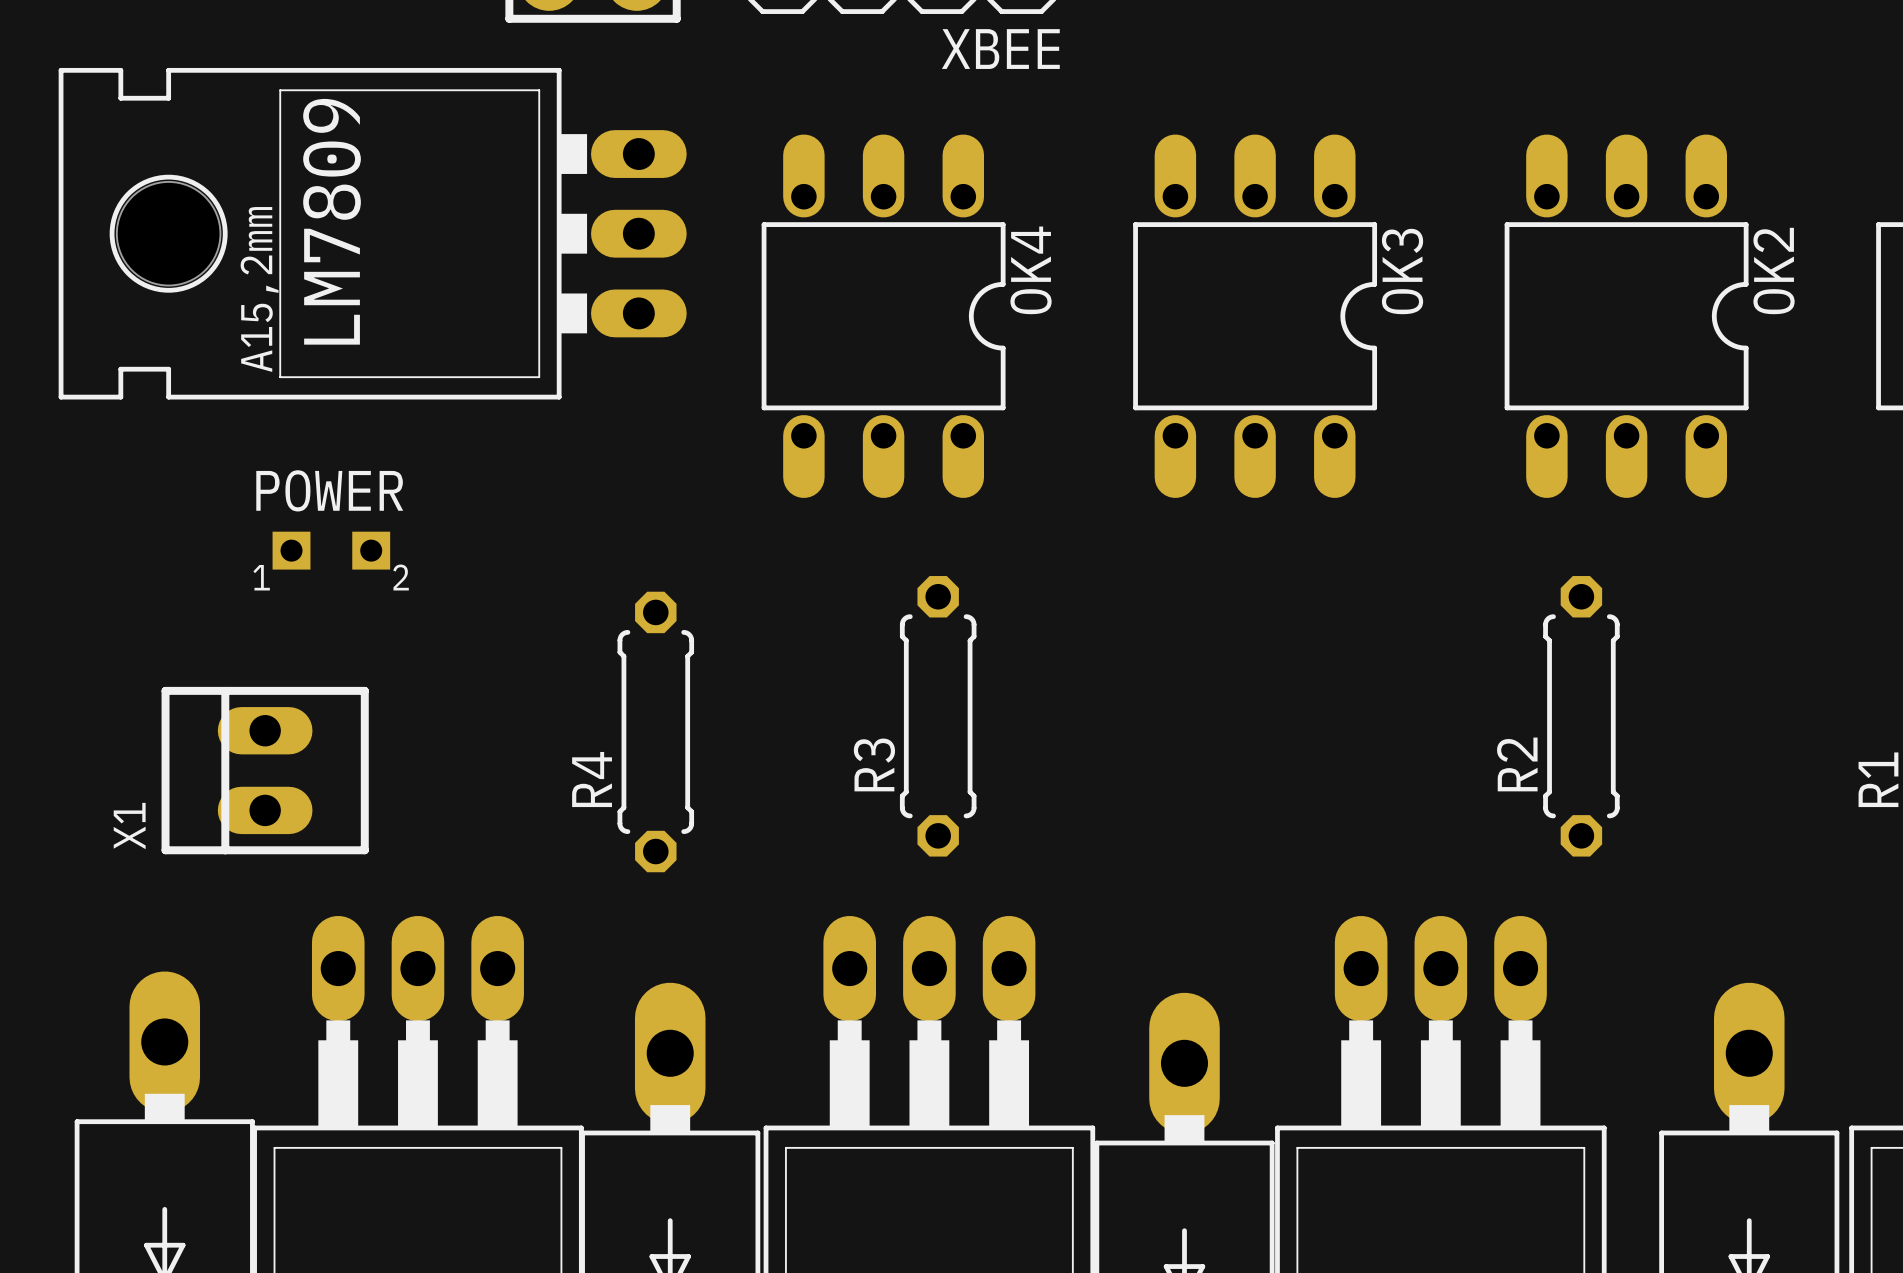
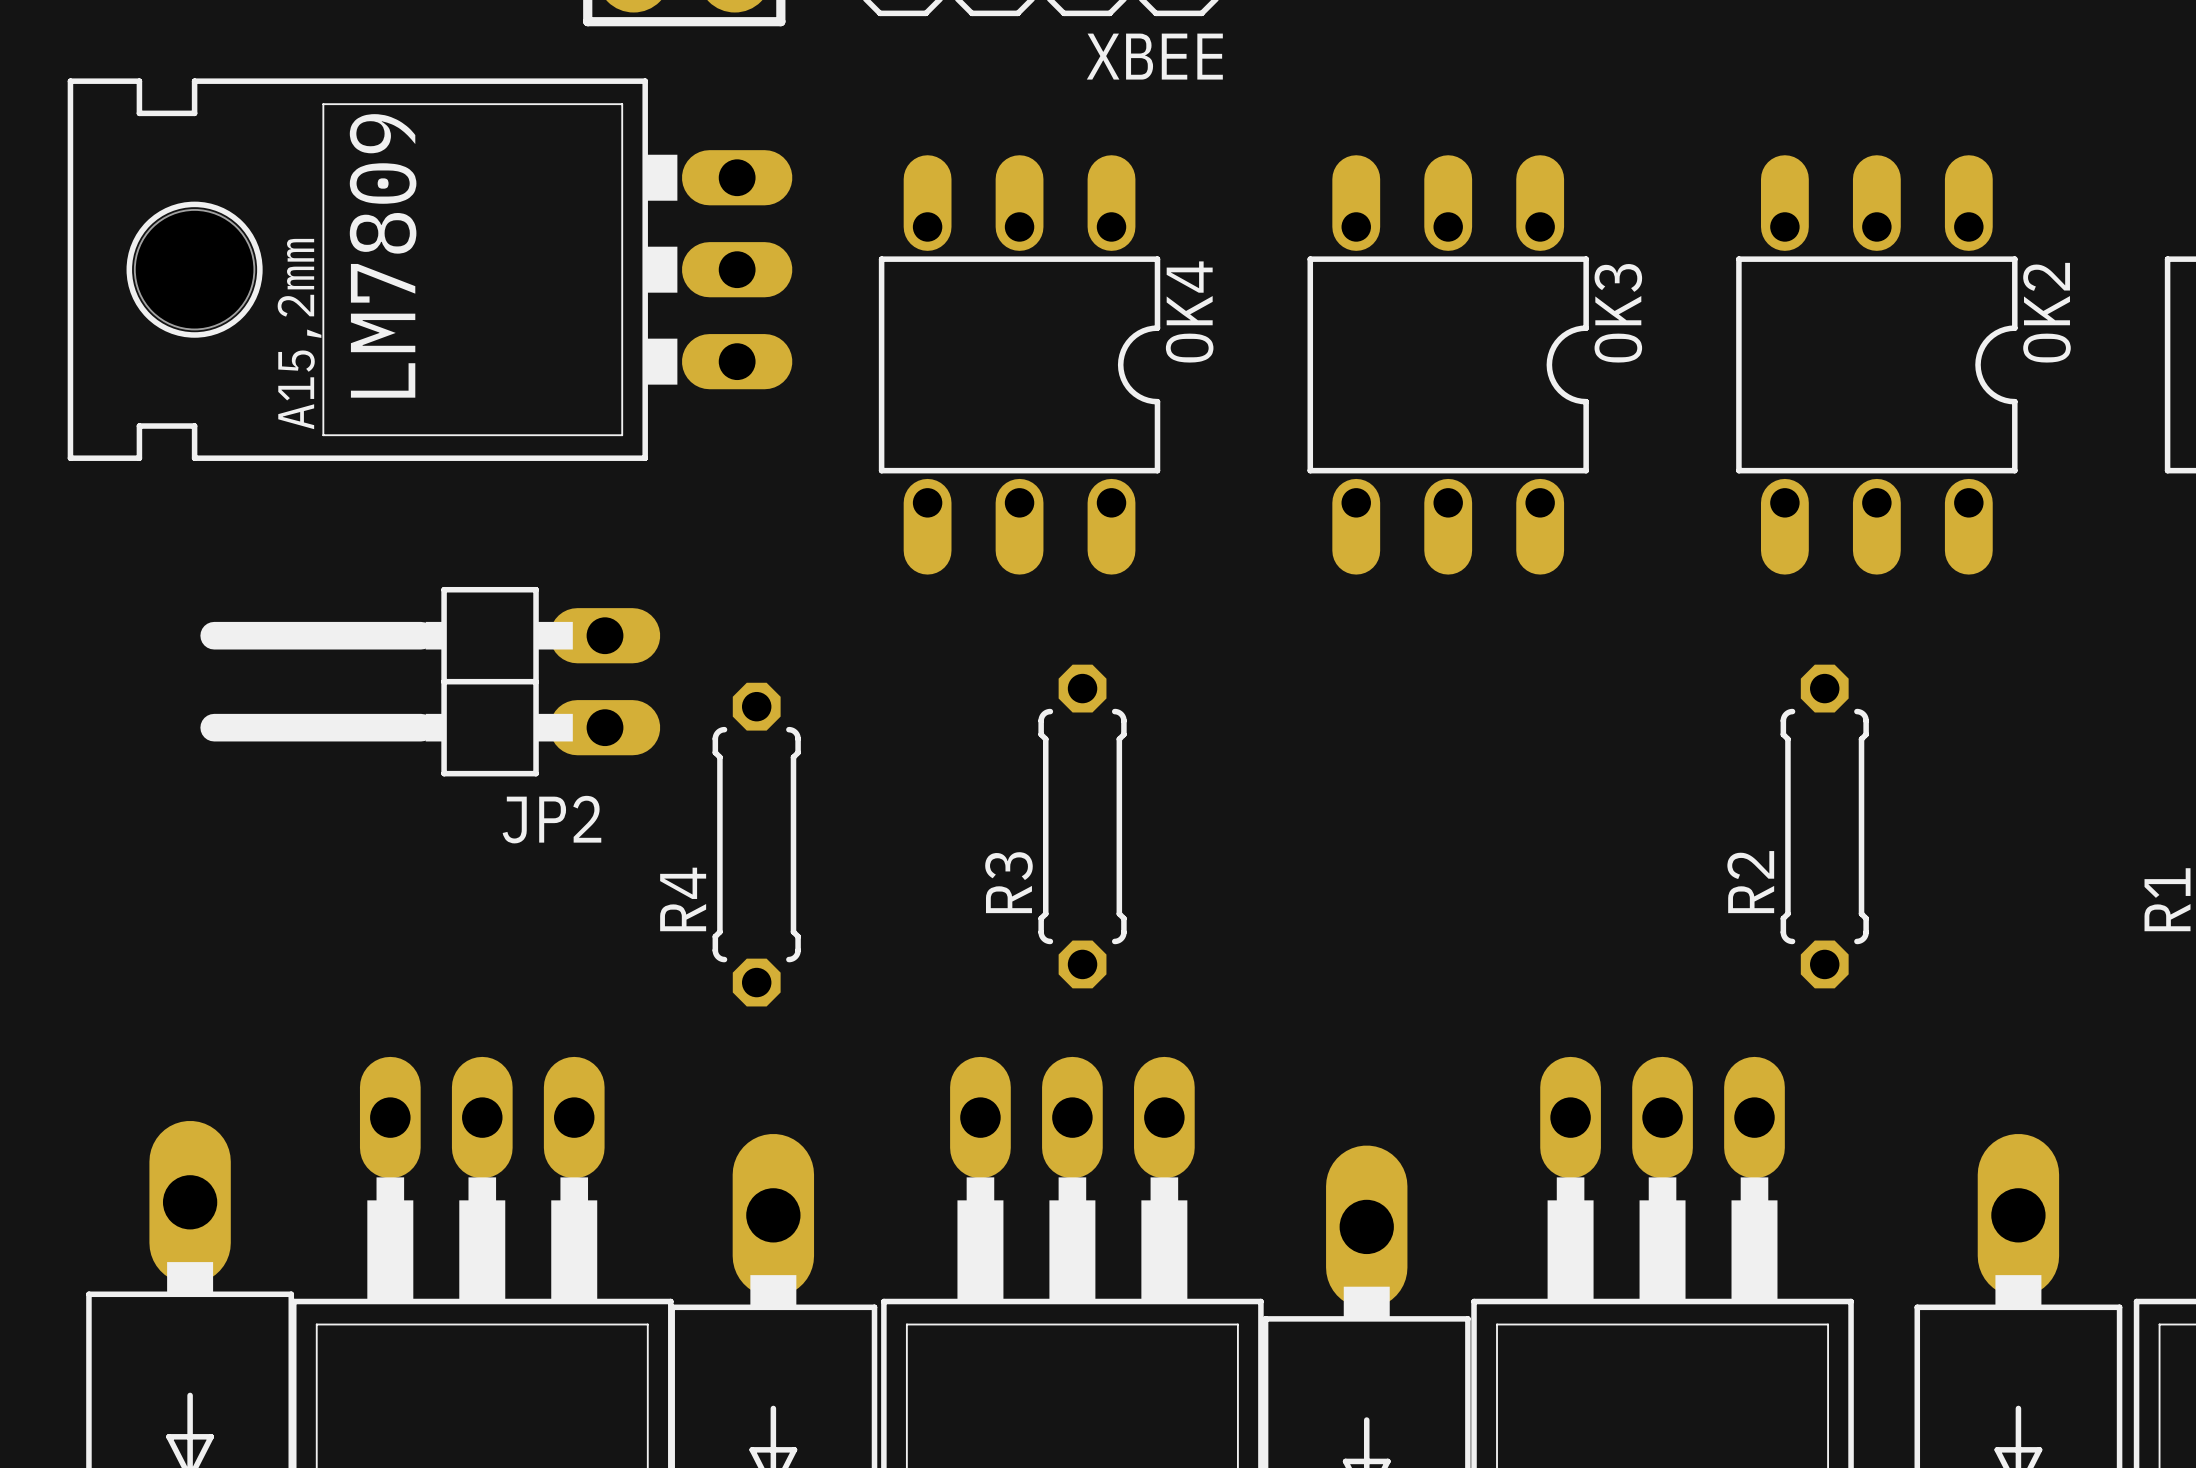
POWER: (331, 550) -> none
JP2: none -> (430, 681)
X1: (265, 770) -> none

